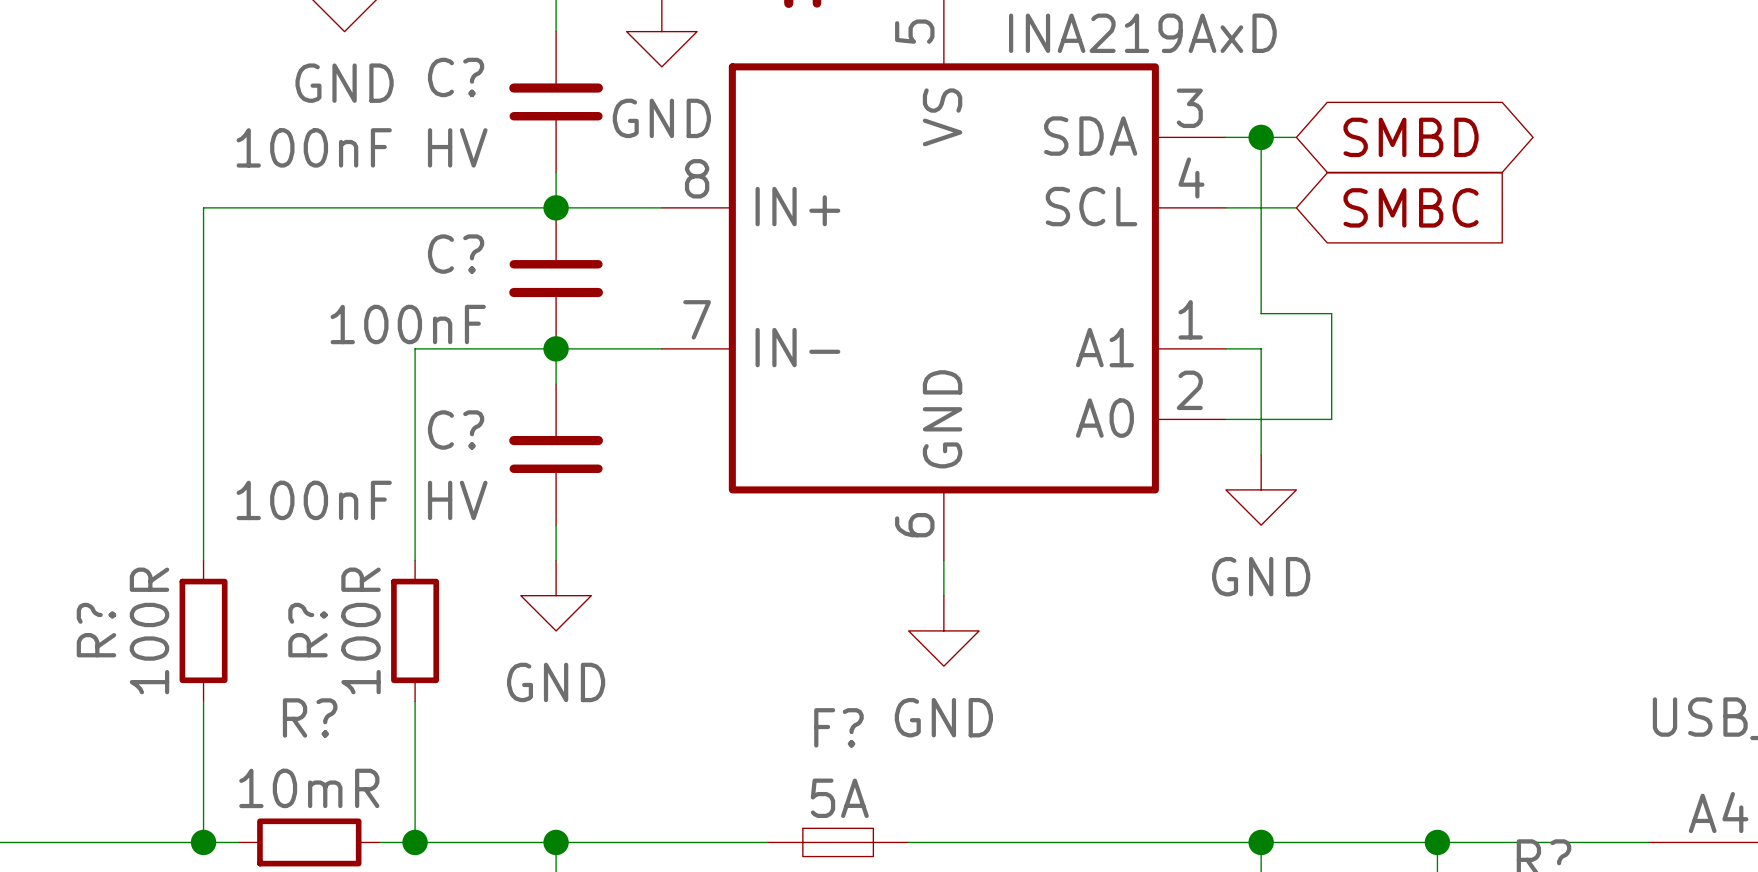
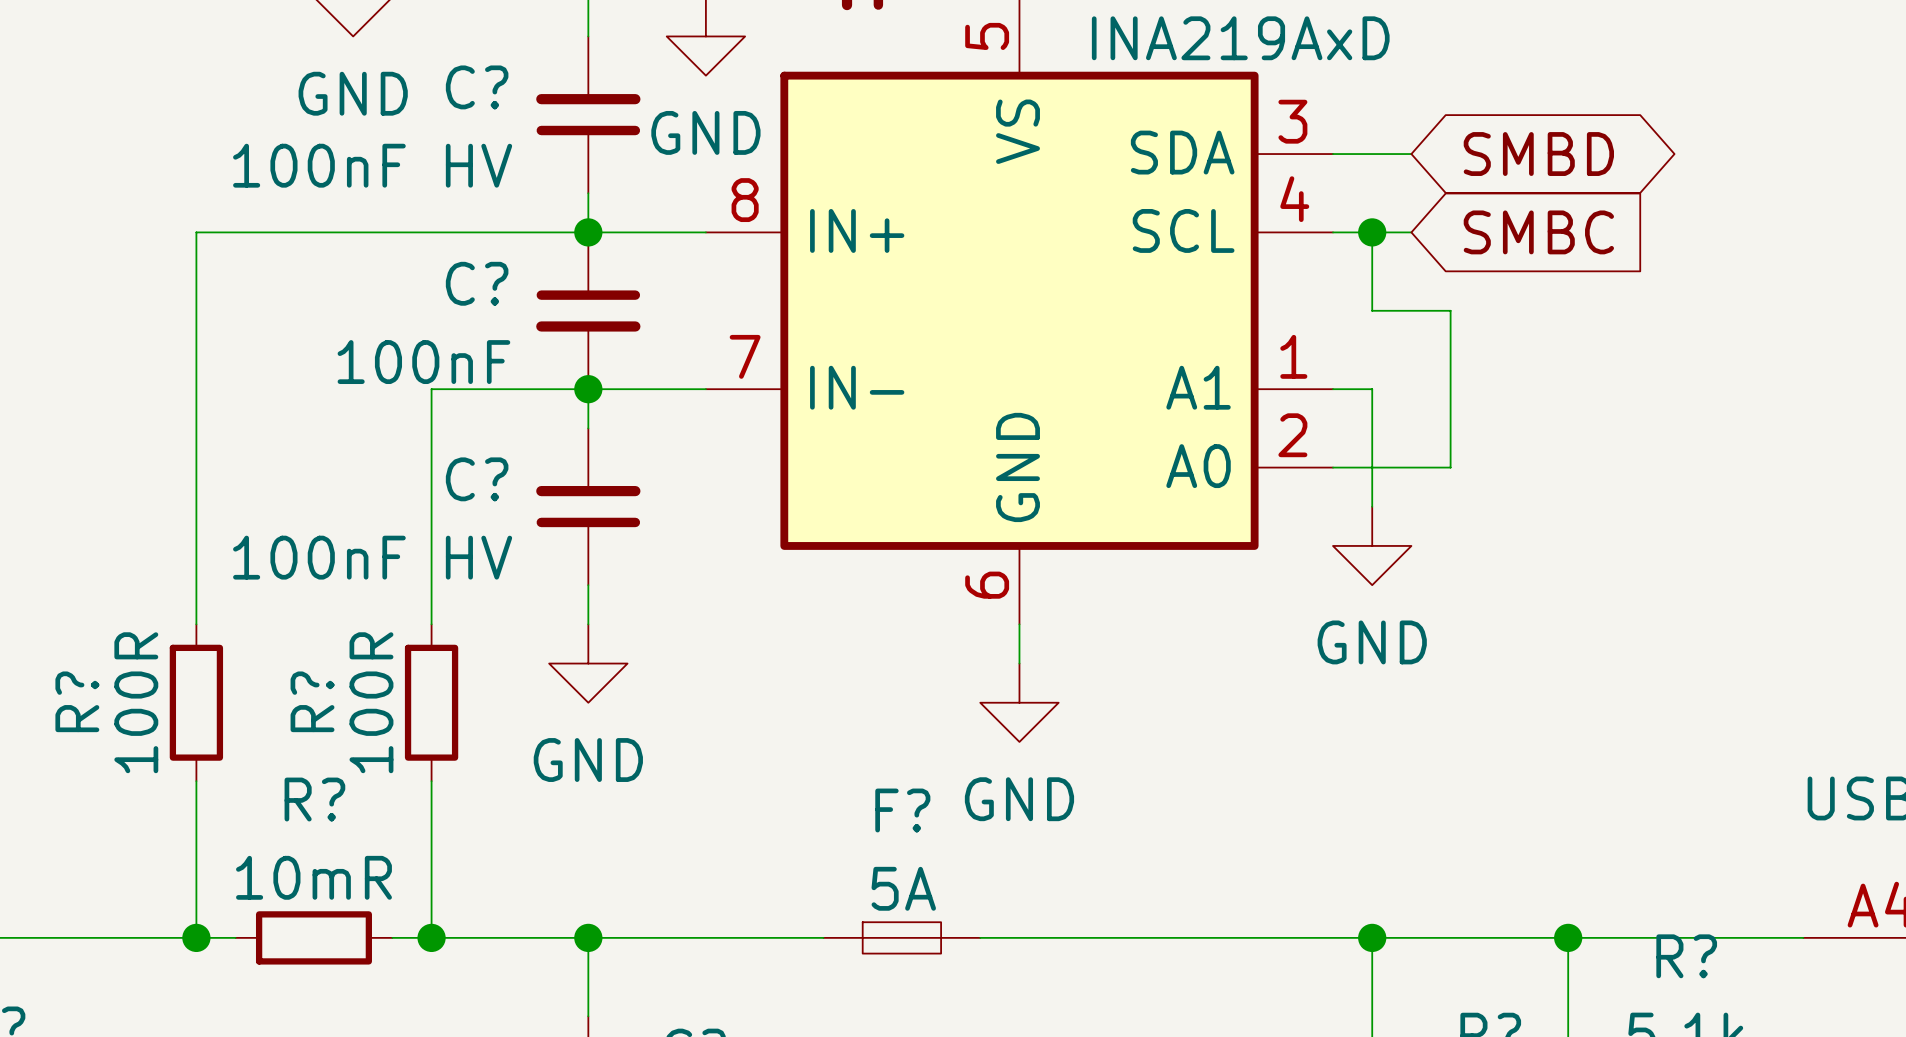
wire: (1261, 137) (1261, 207) -> none
junction position: (1261, 137) -> (1372, 232)
wire: (1261, 278) (1261, 313) (1331, 313) -> (1372, 310) (1450, 310) (1450, 349)

